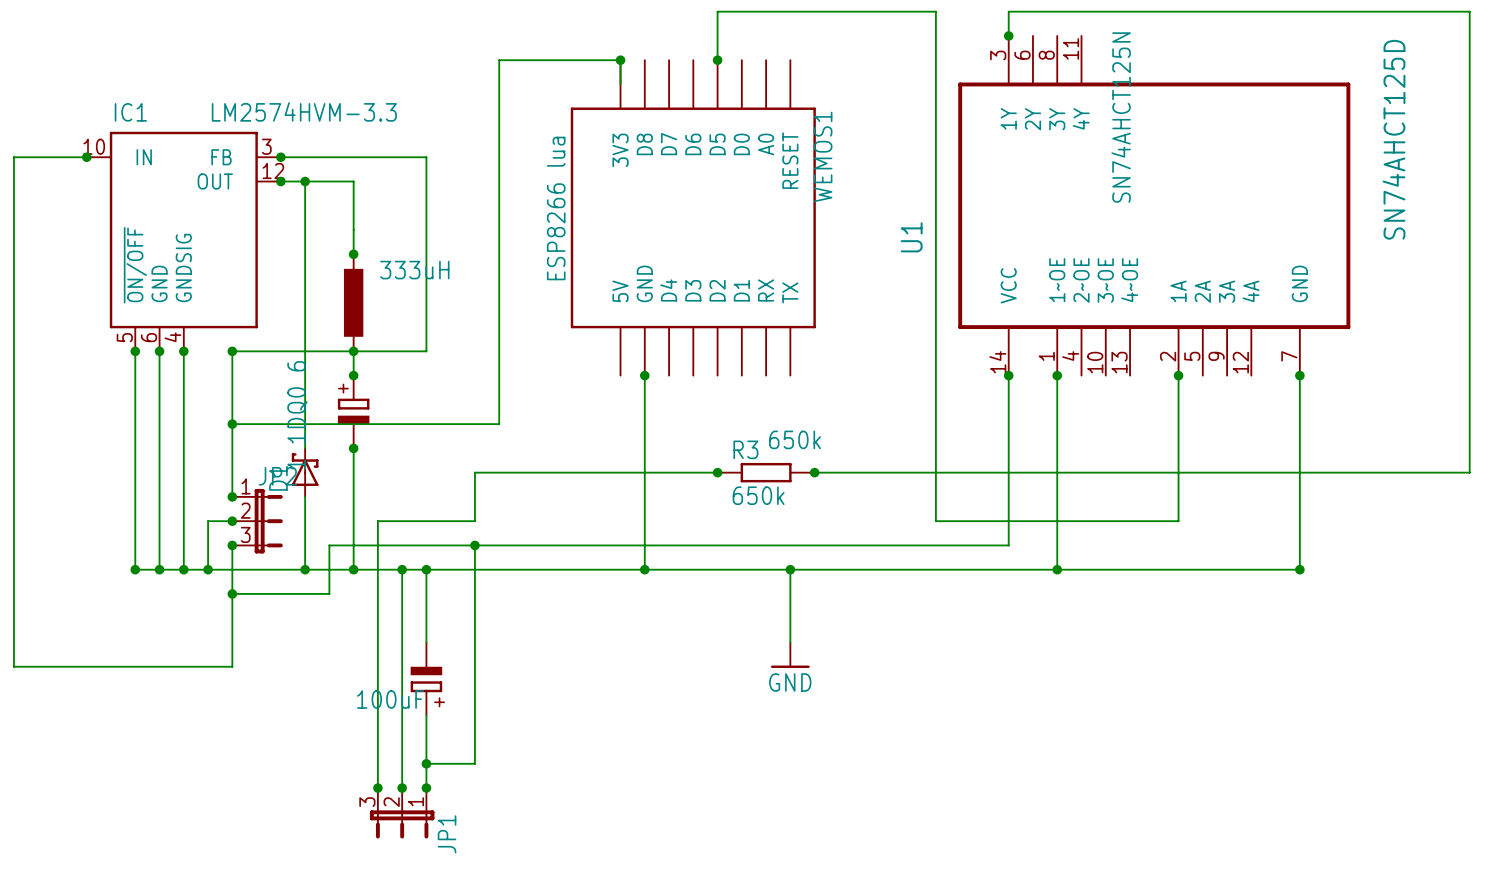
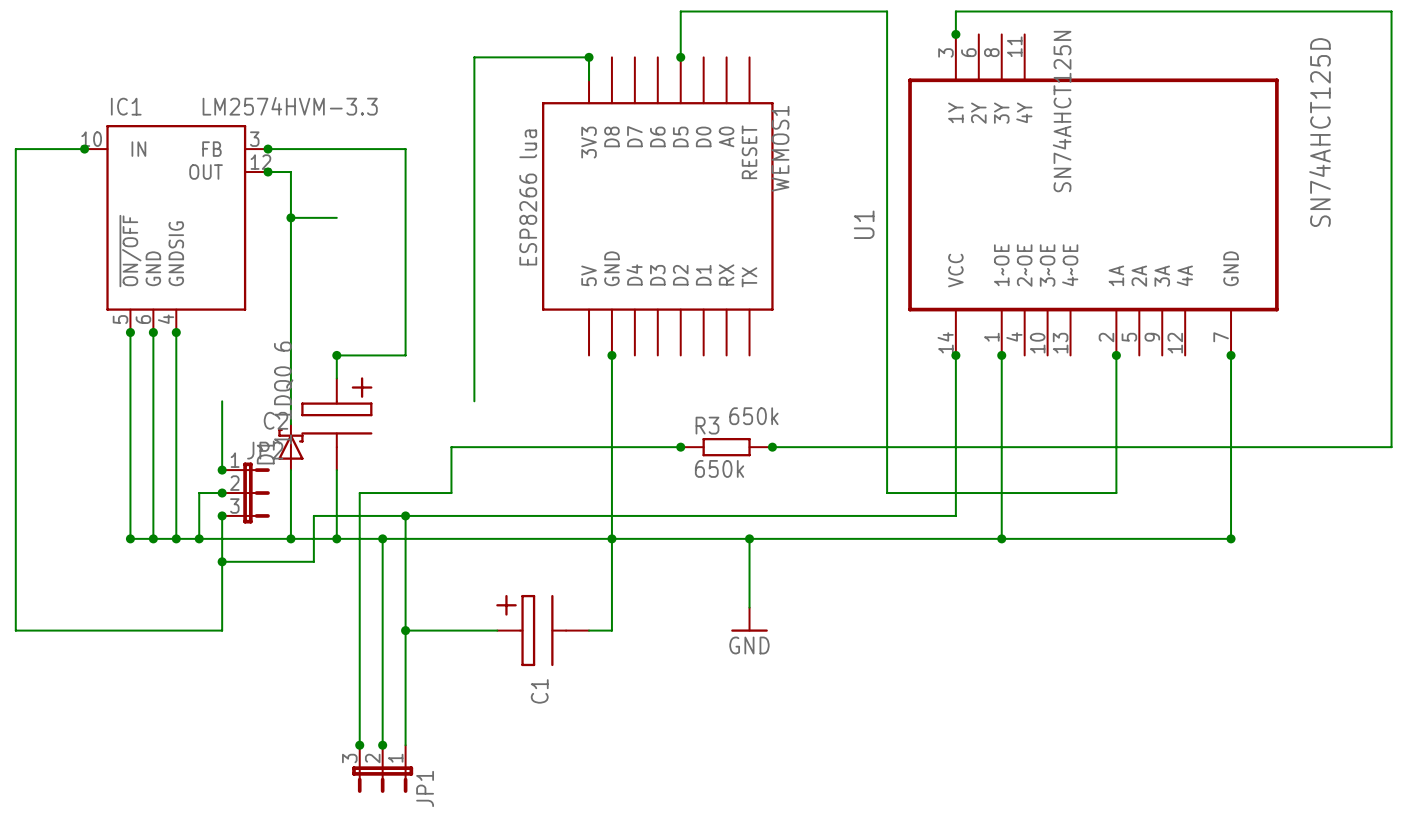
wire: (305, 181) (353, 181) (353, 254) -> none
junction: (305, 181) -> none
wire: none -> (290, 217) (336, 217)
junction: none -> (290, 217)
junction: (353, 254) -> none
part: (353, 302) -> none
junction: (232, 351) -> none
wire: (353, 351) (353, 375) -> (405, 515) (405, 538)
junction: (353, 351) -> none
wire: (426, 351) (232, 351) (232, 424) (499, 424) -> (405, 332) (405, 355) (336, 355) (336, 378)
part: (353, 412) -> none
junction: (232, 424) -> none
C2: none -> (336, 423)
junction: (353, 448) -> none
junction: none -> (405, 515)
wire: (474, 545) (474, 763) (426, 763) -> none
junction: (474, 545) -> none
junction: (426, 569) -> none
wire: none -> (611, 538) (611, 630) (589, 630)
wire: none -> (405, 630) (497, 630)
junction: none -> (405, 630)
C1: none -> (542, 630)
part: (426, 678) -> none
junction: (426, 763) -> none
junction: (426, 788) -> none

